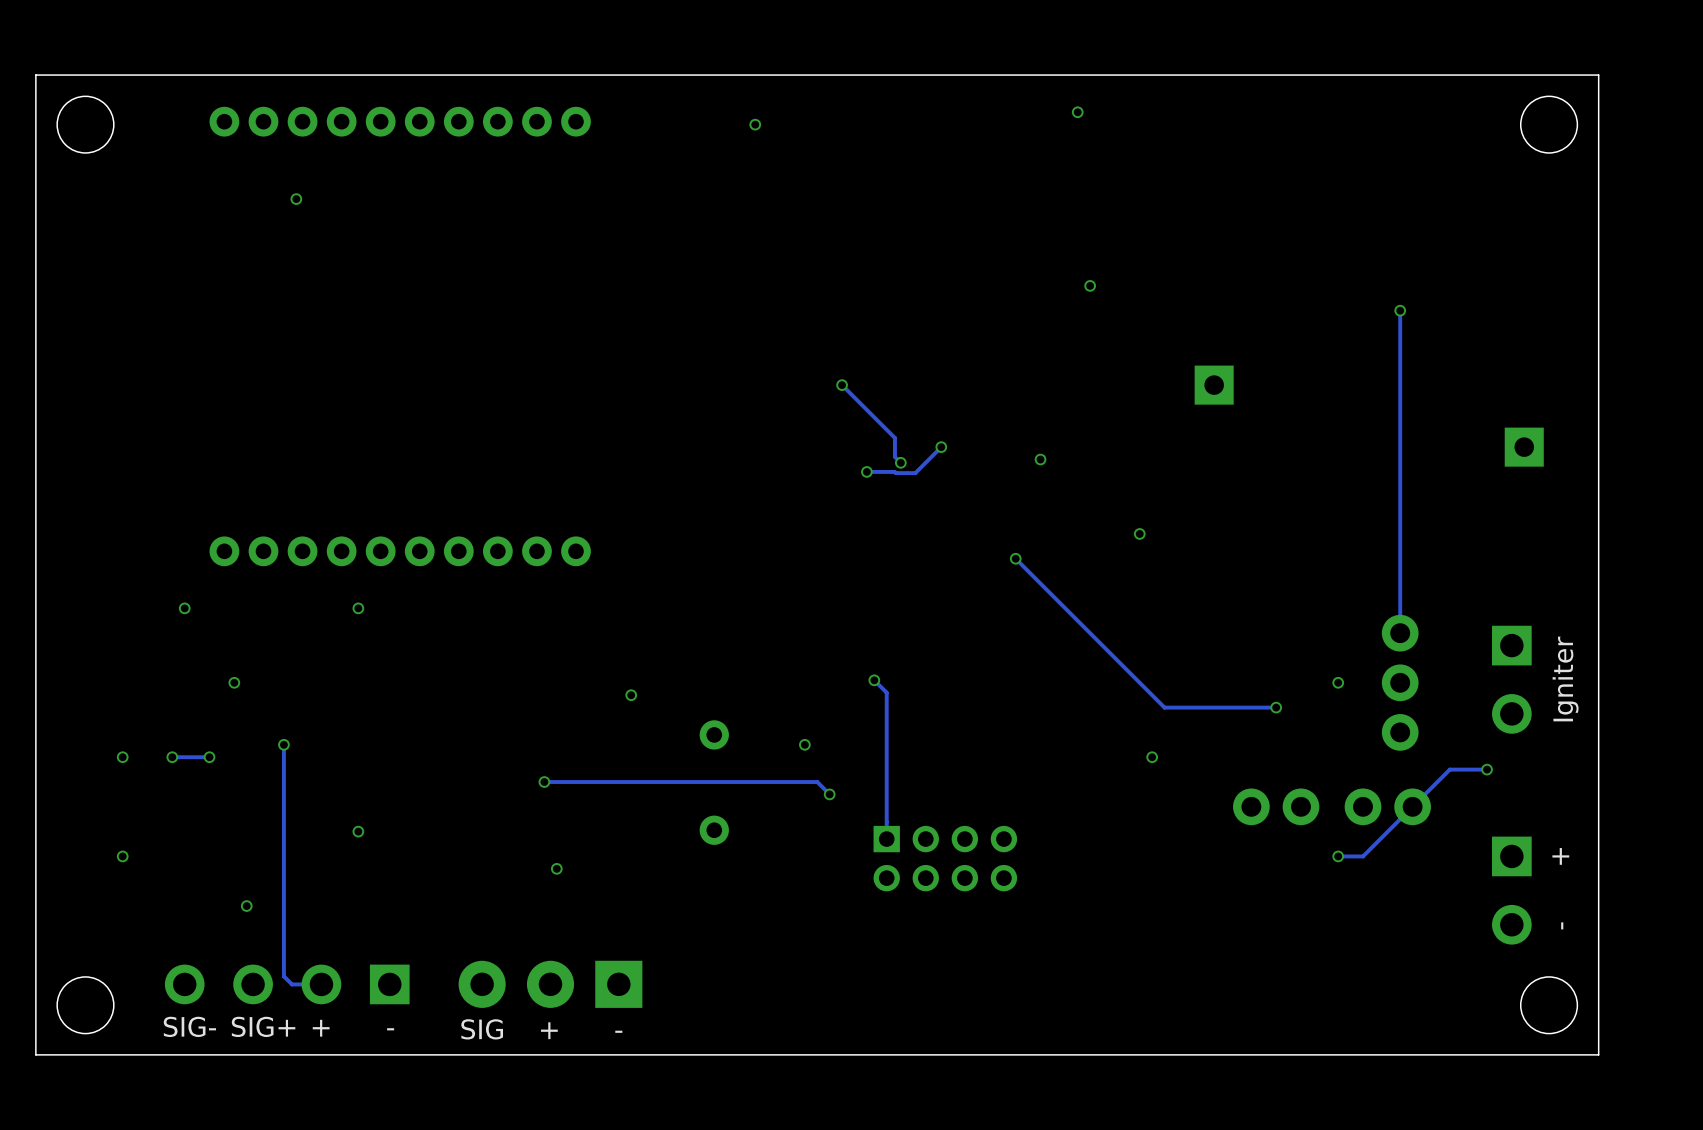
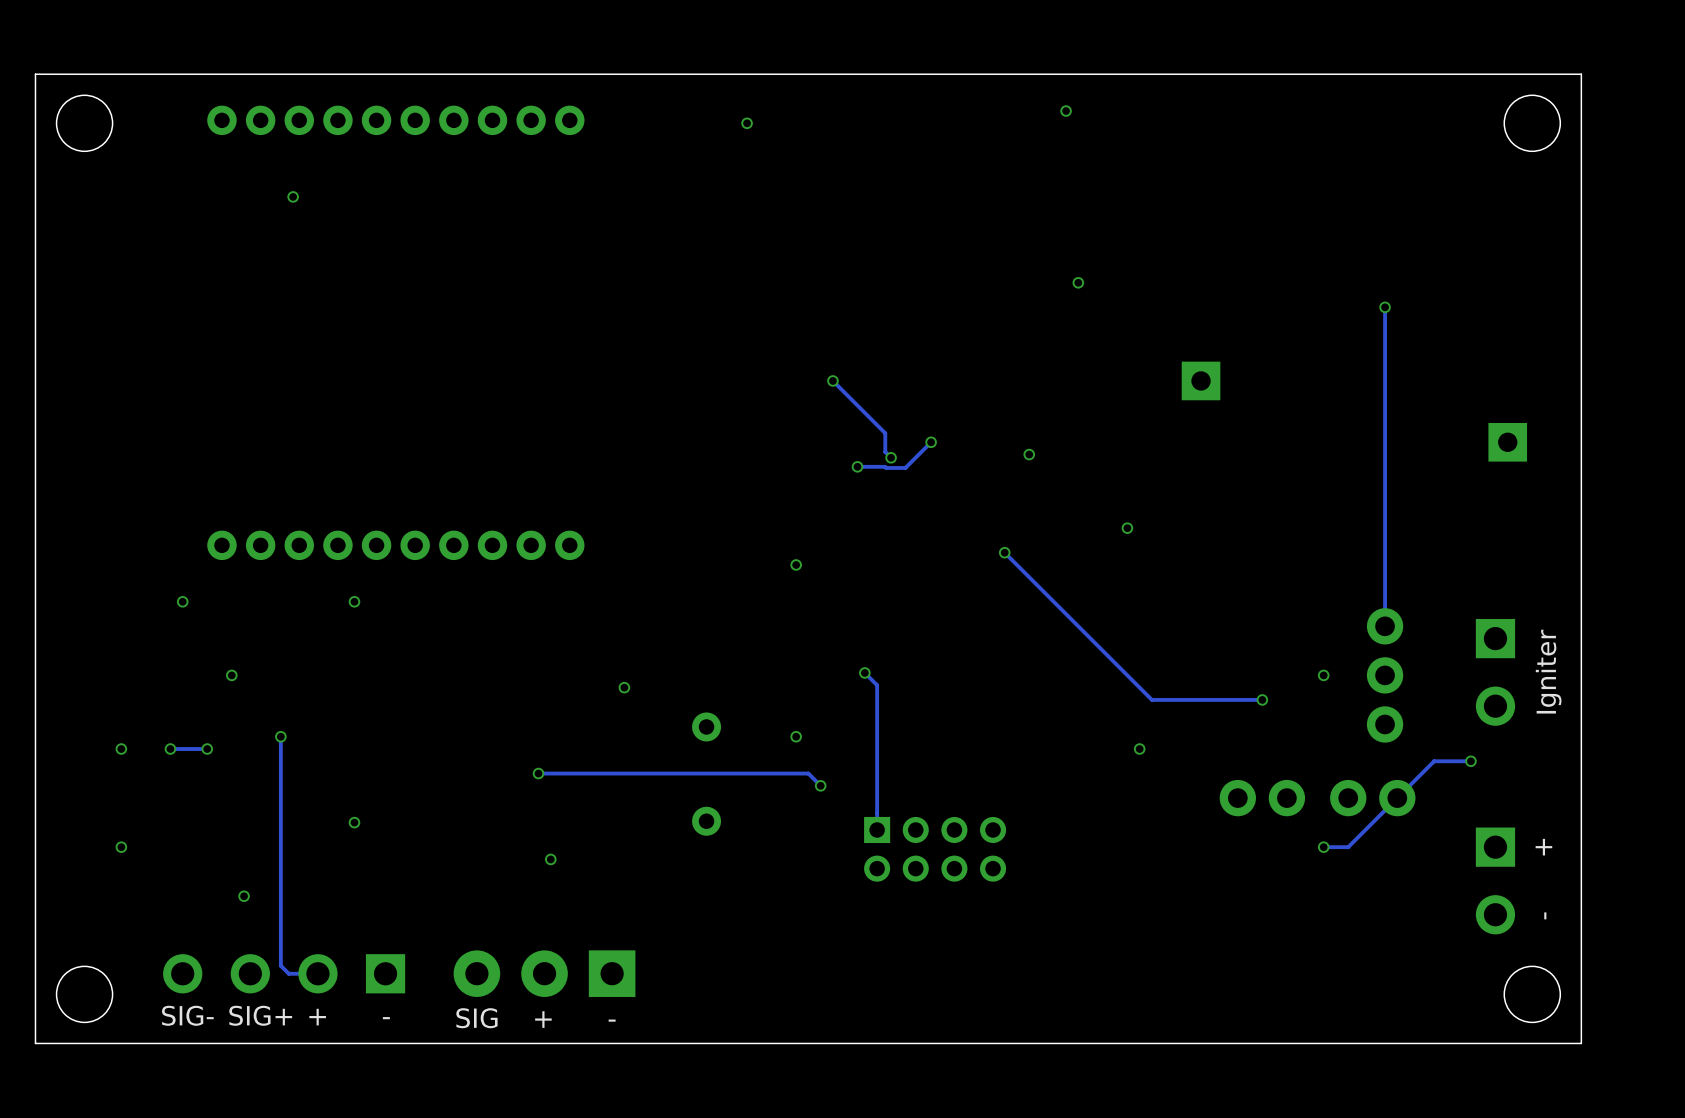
via: none -> (796, 564)

